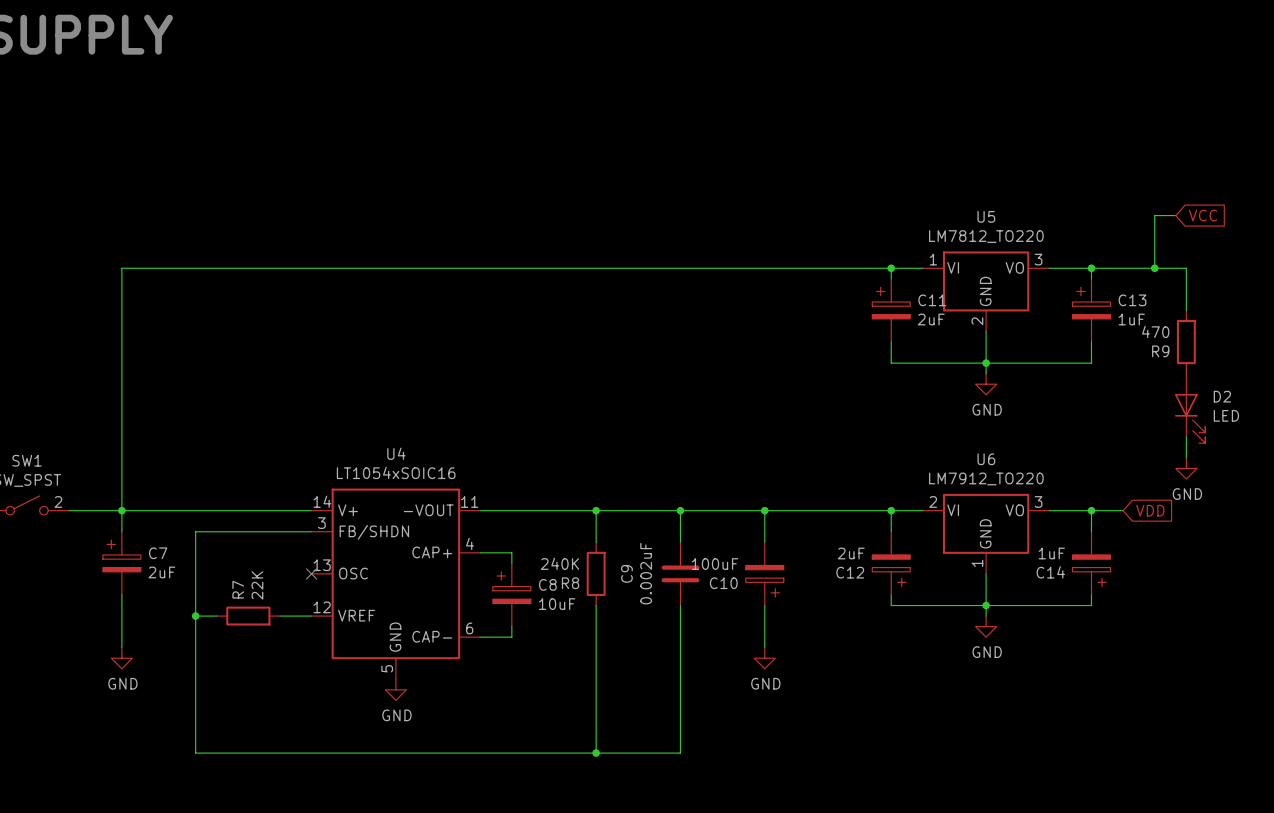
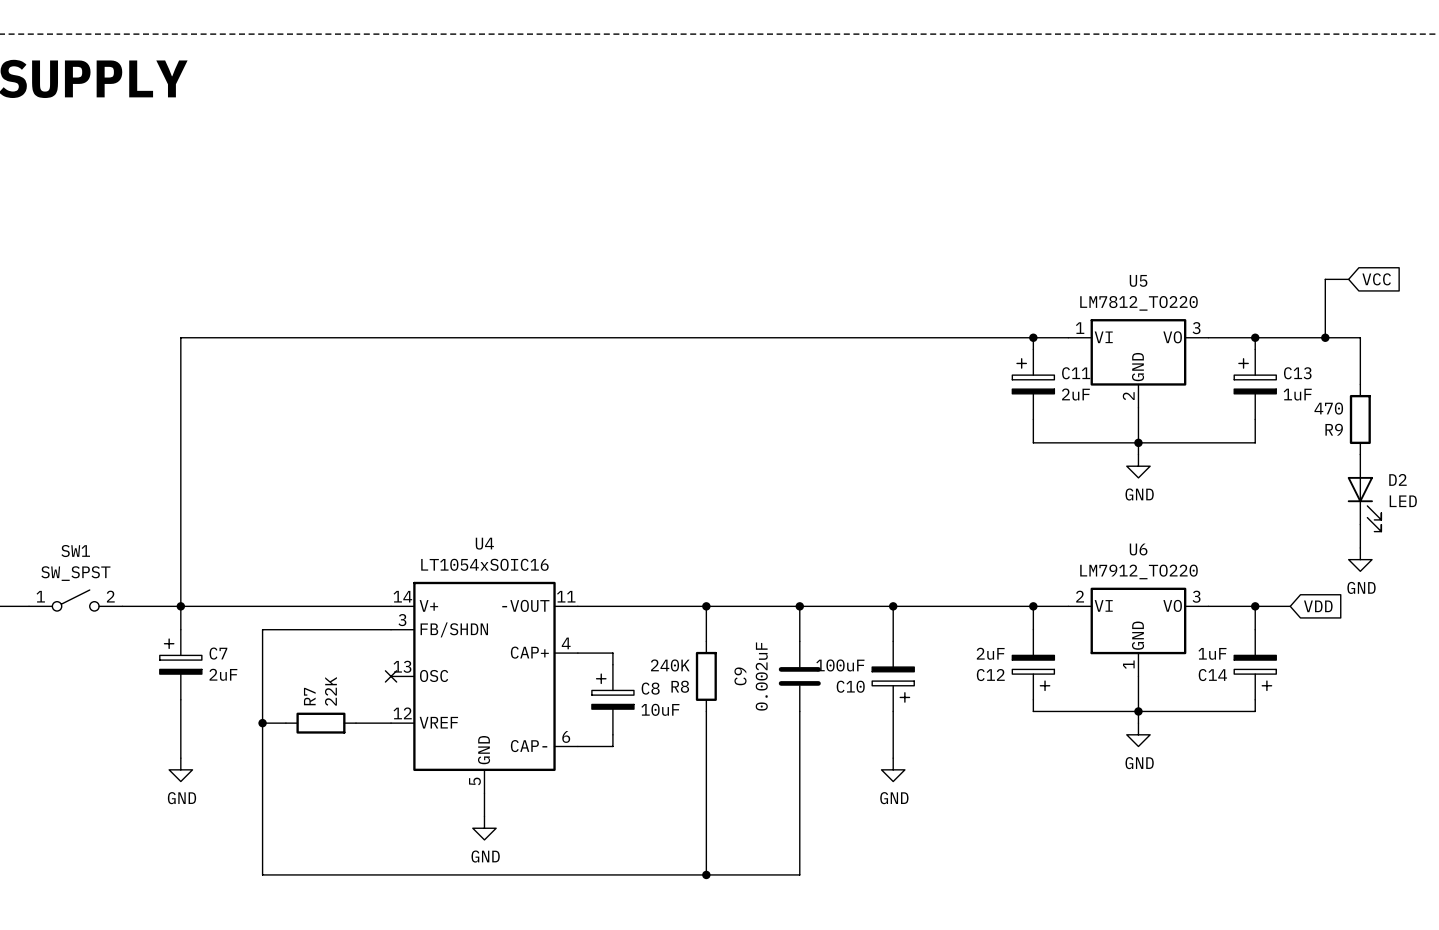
power symbol position: GND (395, 689) -> GND (484, 828)

